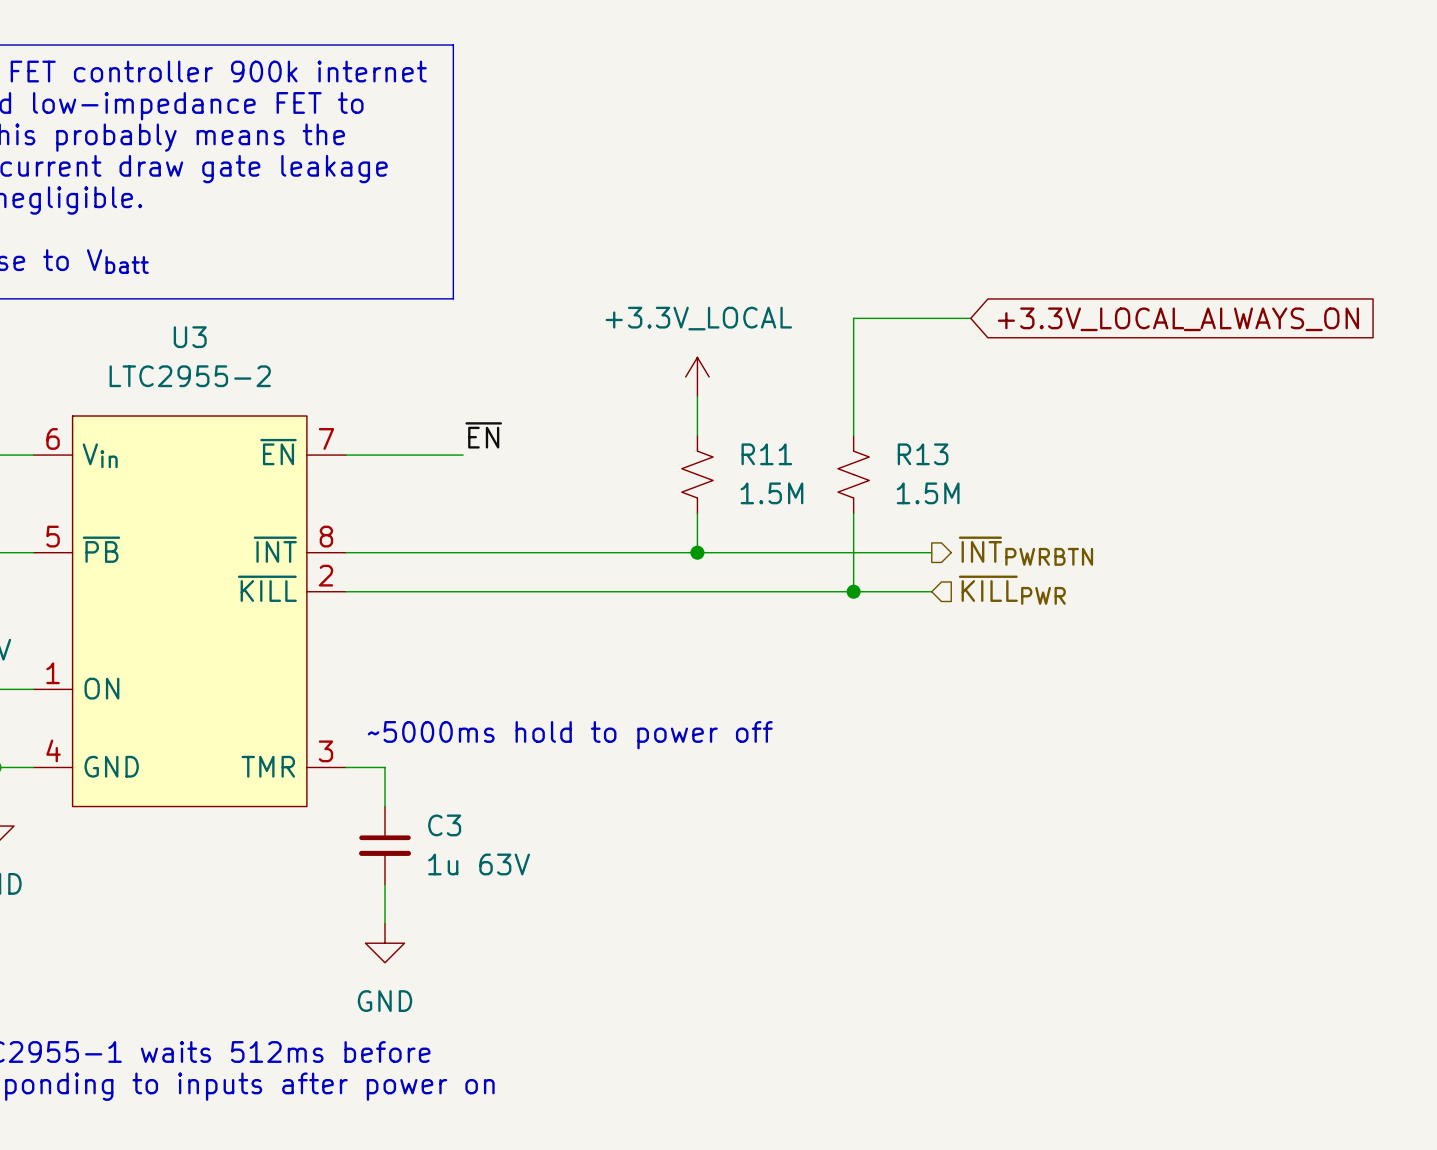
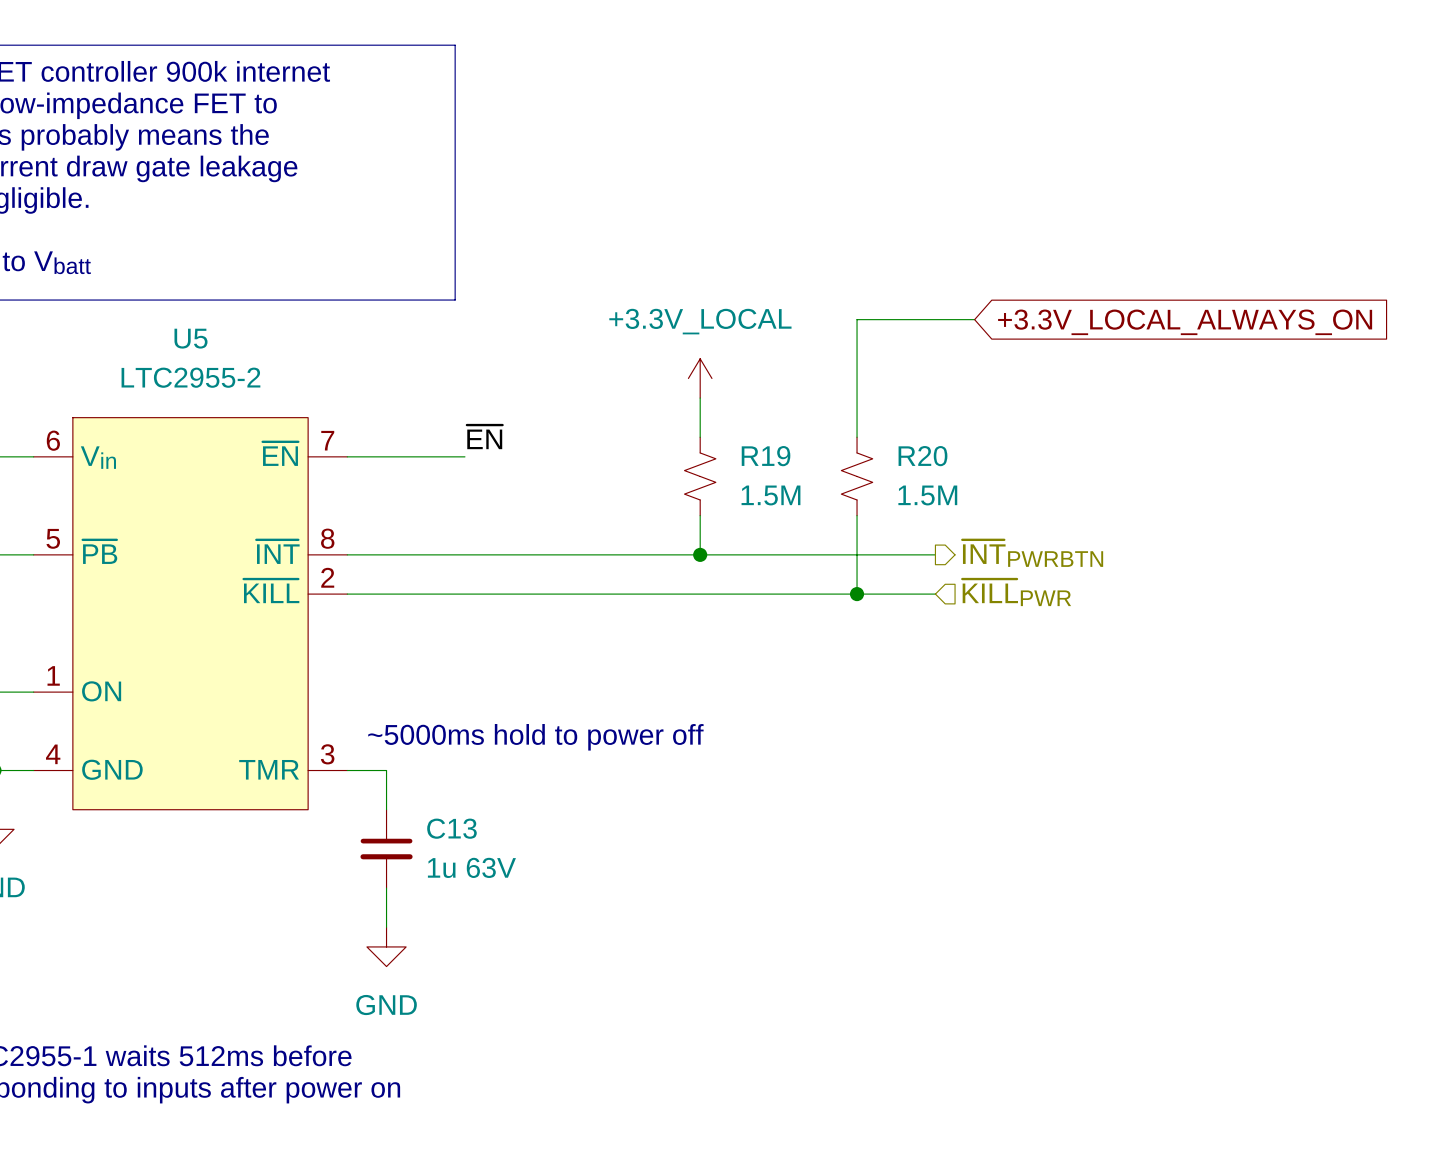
U3 name: U3 (190, 337) -> U5 (191, 338)
R11 name: R11 (766, 454) -> R19 (766, 456)
R13 name: R13 (923, 454) -> R20 (922, 456)
C3 name: C3 (444, 825) -> C13 (451, 828)

